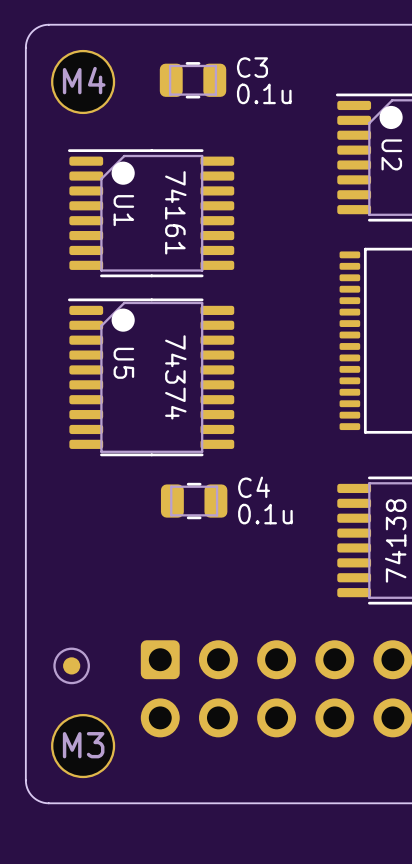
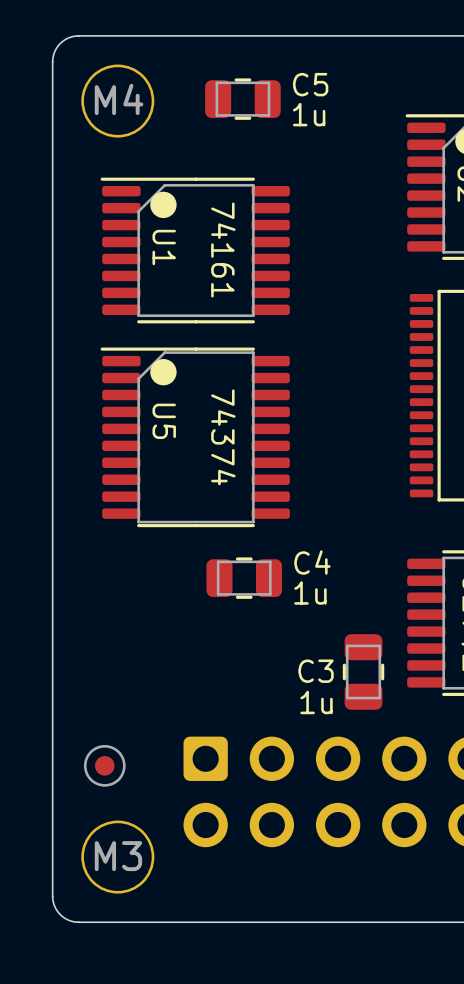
C3 name: C3 (252, 67) -> C5 (310, 84)
C3 value: 0.1u (264, 93) -> 1u (309, 114)
C4 value: 0.1u (265, 514) -> 1u (310, 592)
C3: none -> 1u (363, 671)

